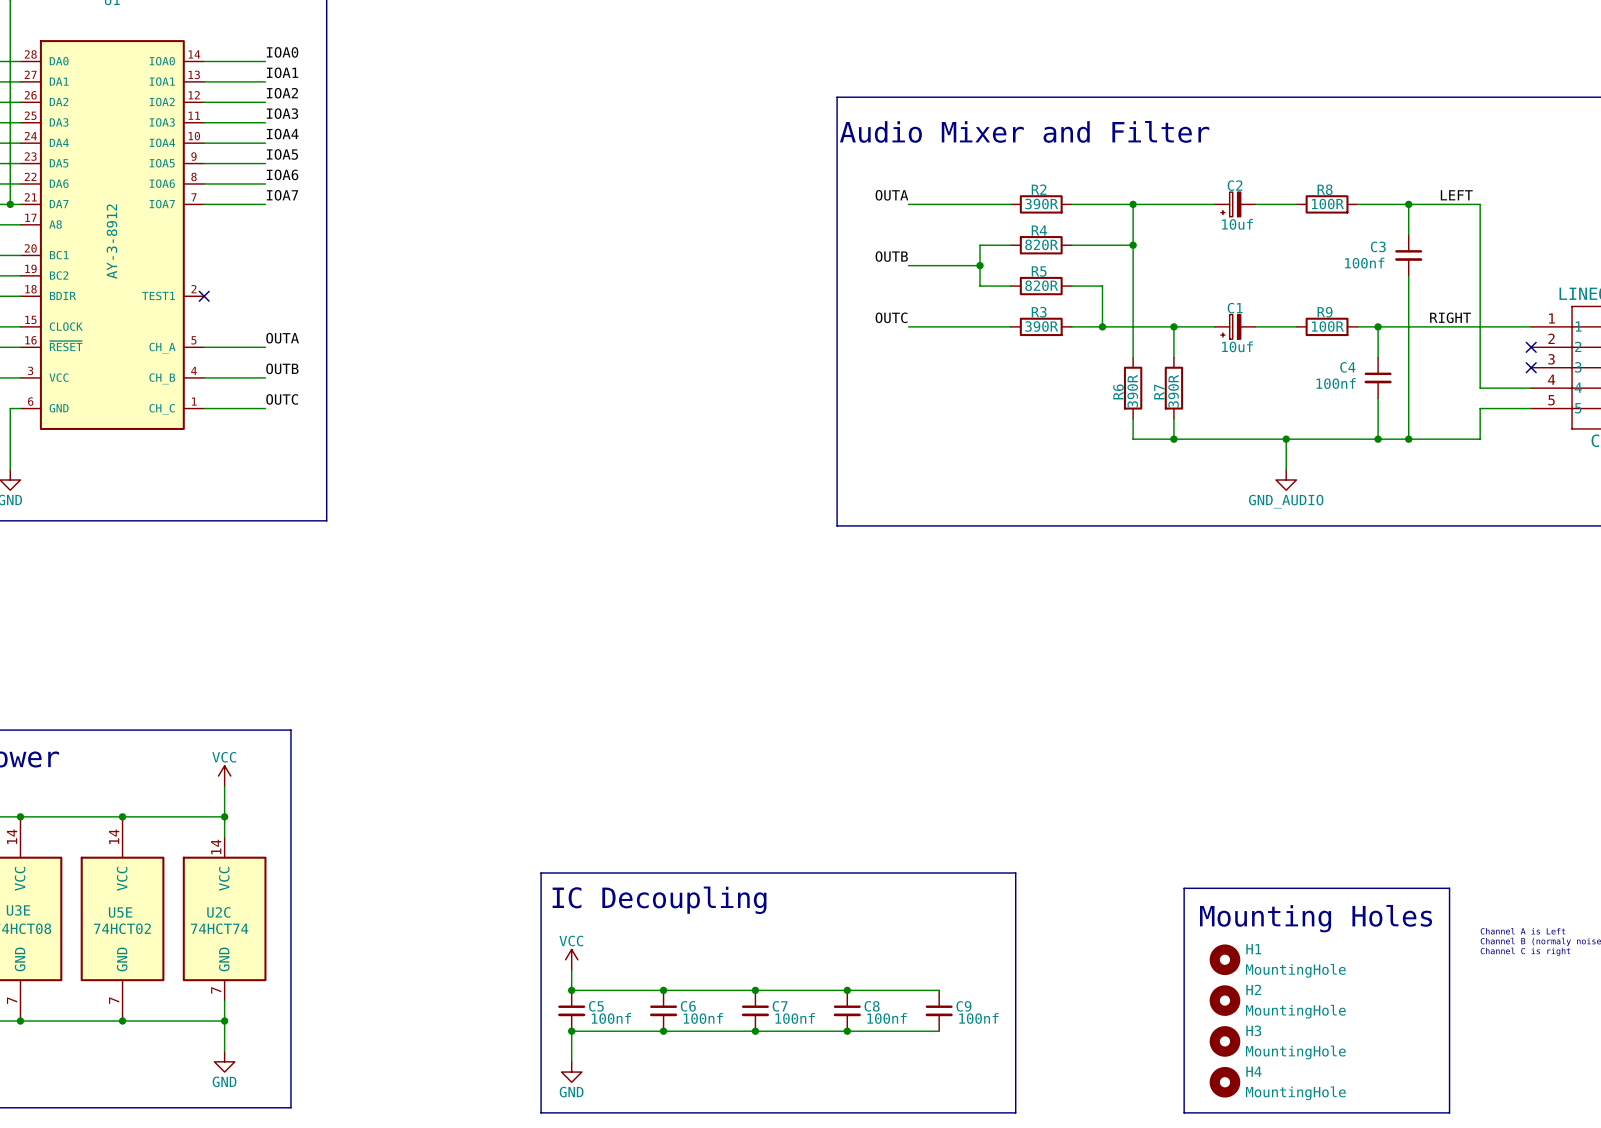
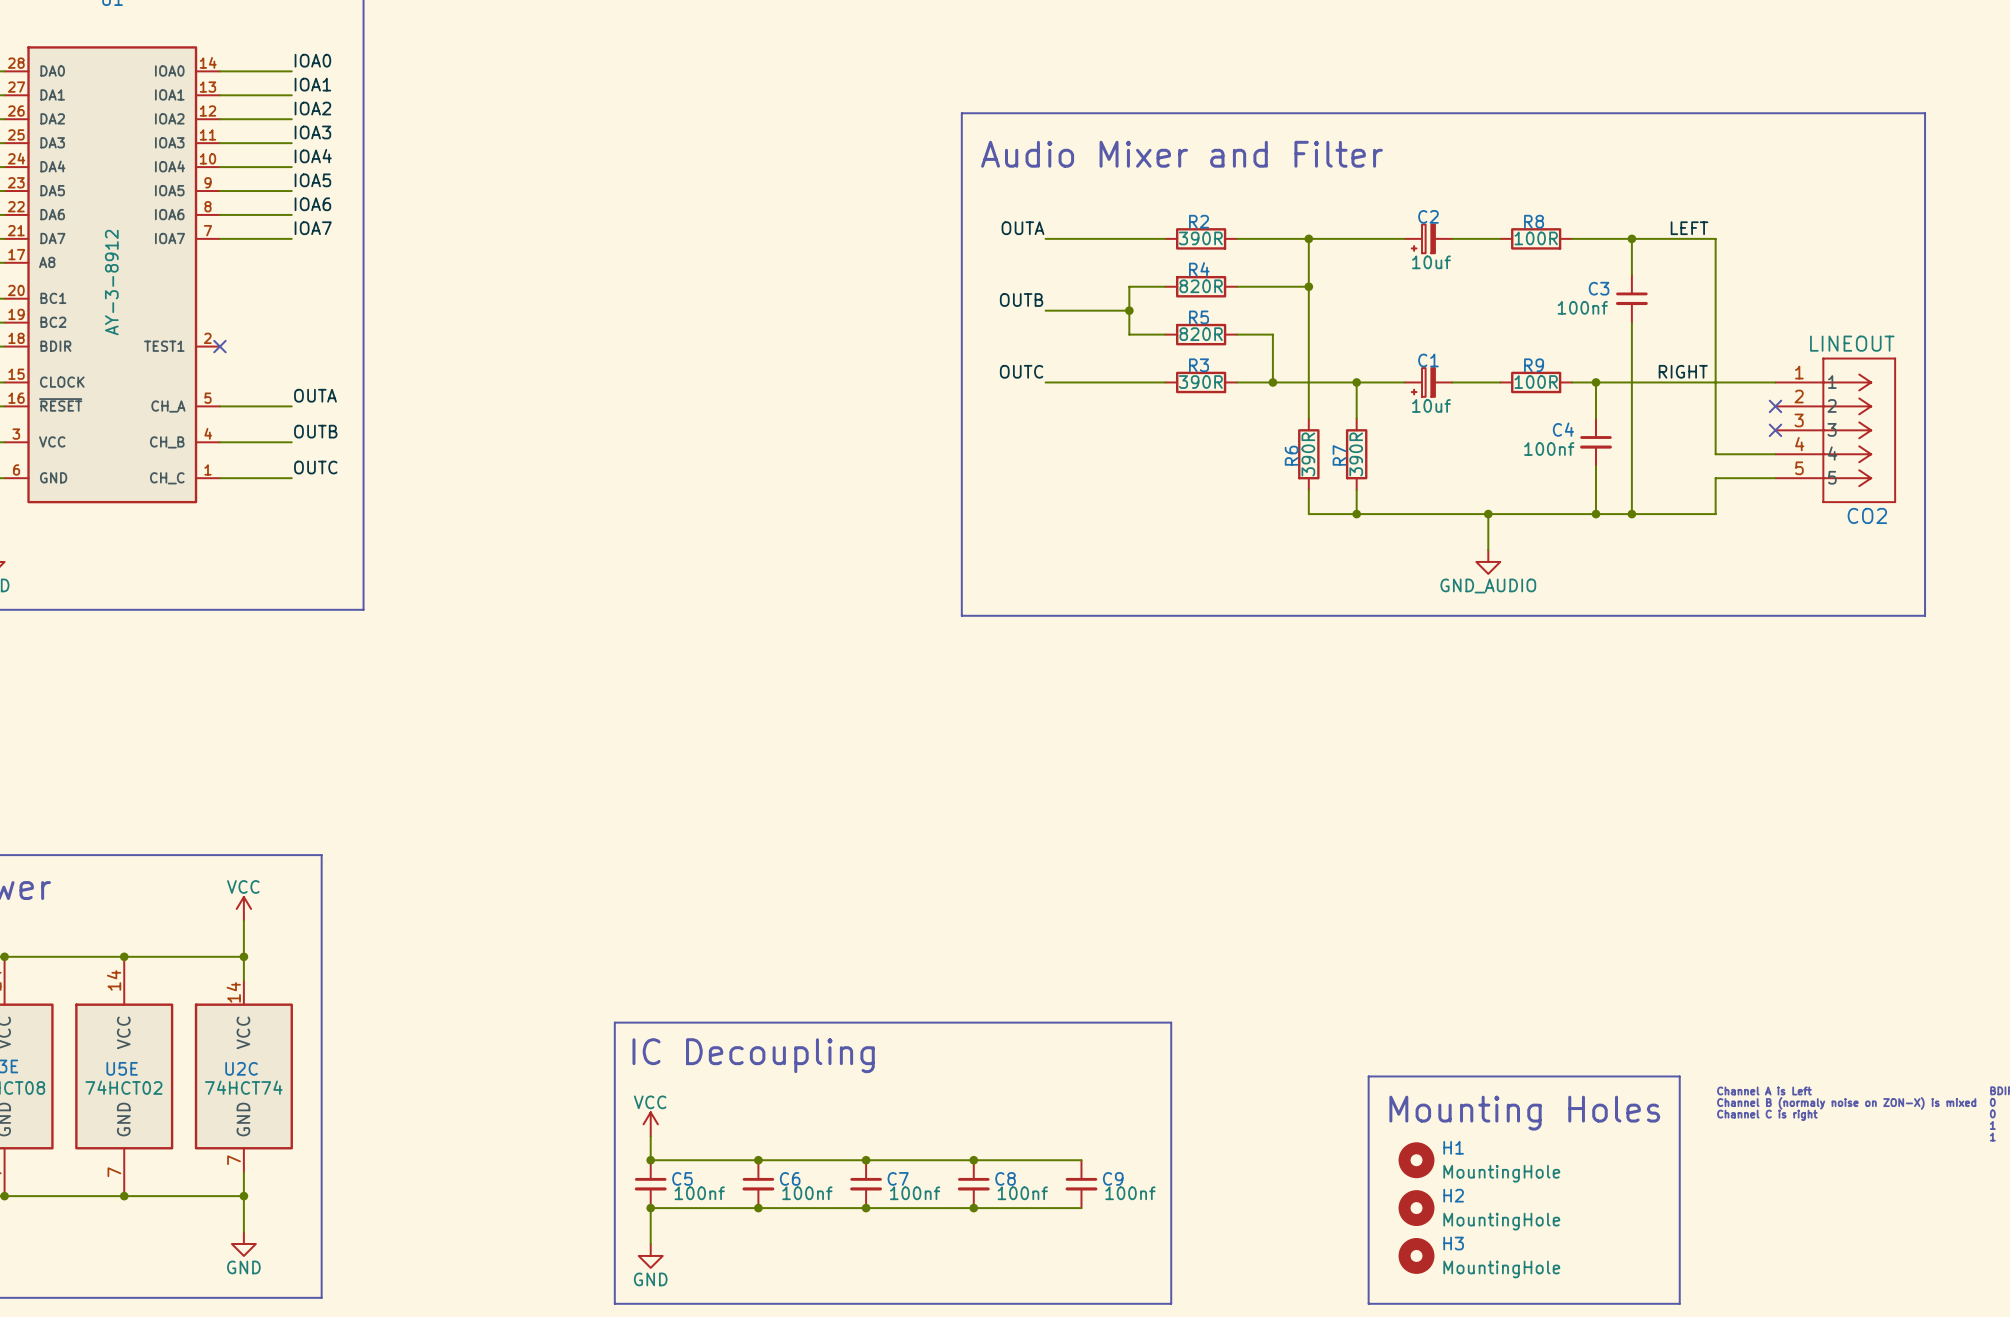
line: (1184, 918) (1184, 888) (1449, 888) (1449, 918) -> (1368, 1076) (1679, 1076)
text position: Mounting Holes (1316, 918) -> Mounting Holes (1524, 1113)
H1 position: (1224, 959) -> (1416, 1160)
H2 position: (1224, 1000) -> (1416, 1208)
H3 position: (1224, 1041) -> (1416, 1255)
H4: MountingHole (1224, 1082) -> none

